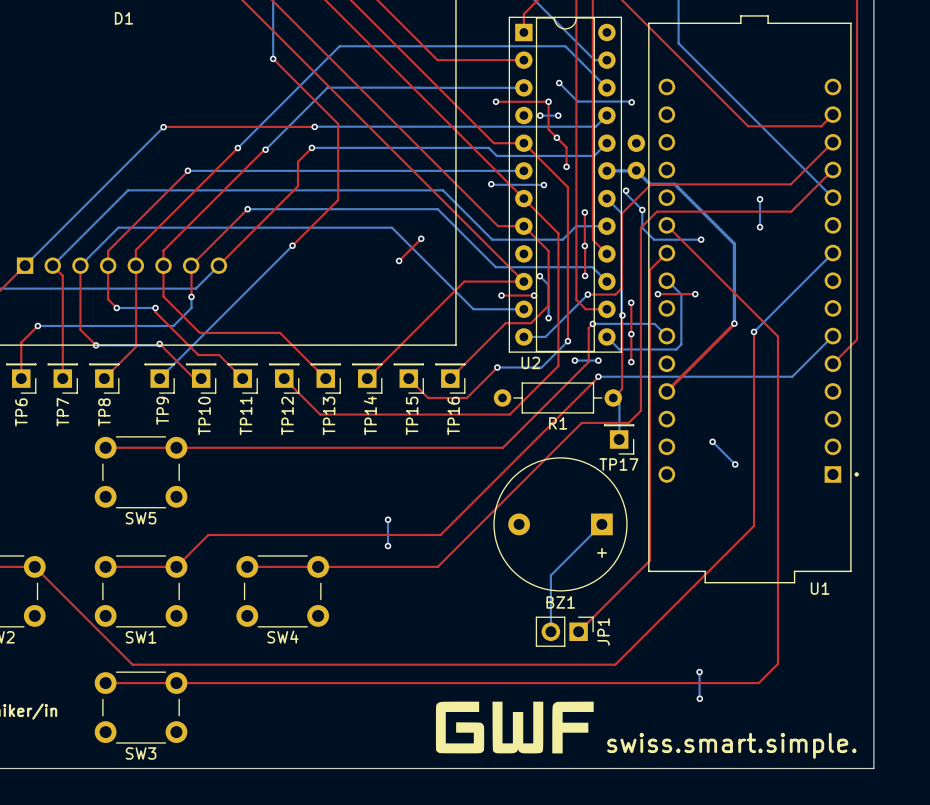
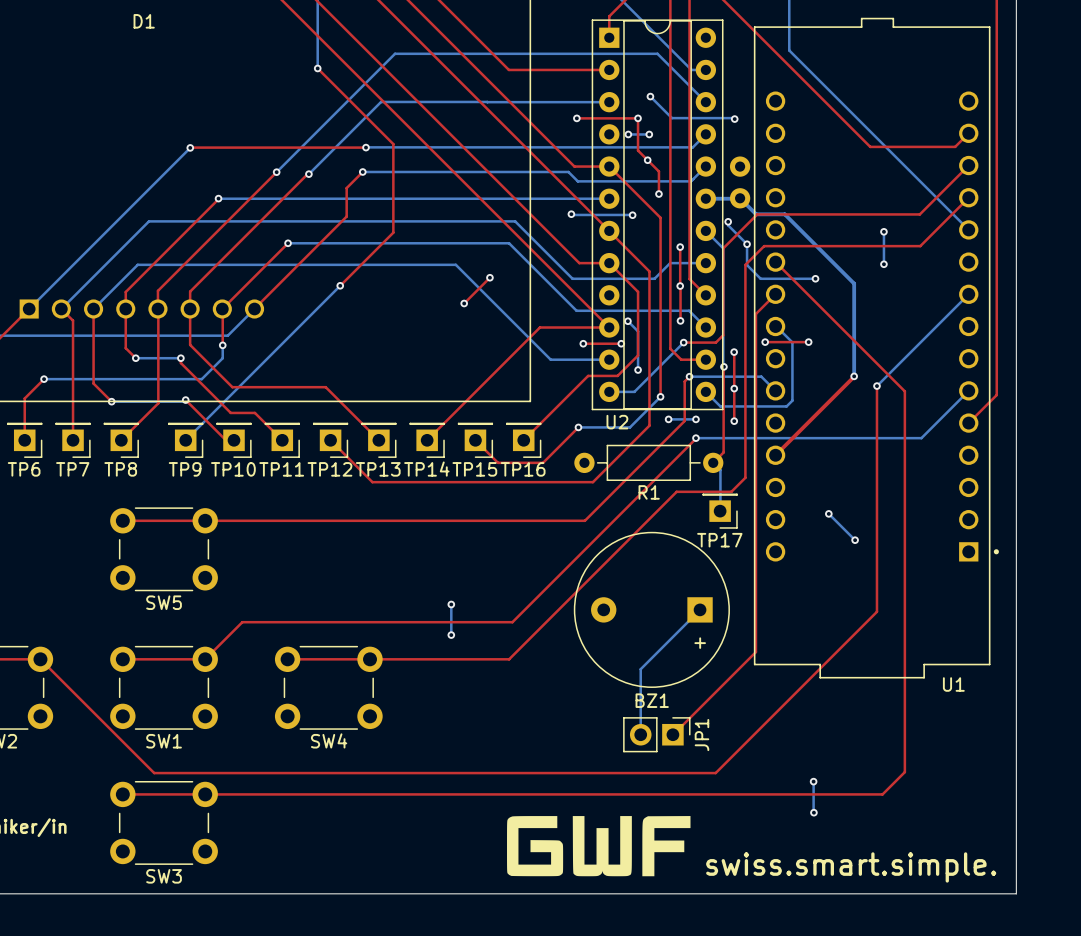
TP9 name rotation: 0° (162, 410) -> 90° clockwise (185, 469)
TP6 name rotation: 0° (21, 412) -> 90° clockwise (24, 469)
TP7 name rotation: 0° (62, 412) -> 90° clockwise (72, 469)
TP8 name rotation: 0° (104, 412) -> 90° clockwise (120, 469)
TP10 name rotation: 0° (204, 415) -> 90° clockwise (233, 469)
TP11 name rotation: 0° (246, 415) -> 90° clockwise (281, 469)
TP12 name rotation: 0° (287, 415) -> 90° clockwise (329, 469)
TP13 name rotation: 0° (329, 415) -> 90° clockwise (378, 469)
TP14 name rotation: 0° (370, 415) -> 90° clockwise (426, 469)
TP15 name rotation: 0° (412, 415) -> 90° clockwise (474, 469)
TP16 name rotation: 0° (453, 415) -> 90° clockwise (523, 469)

